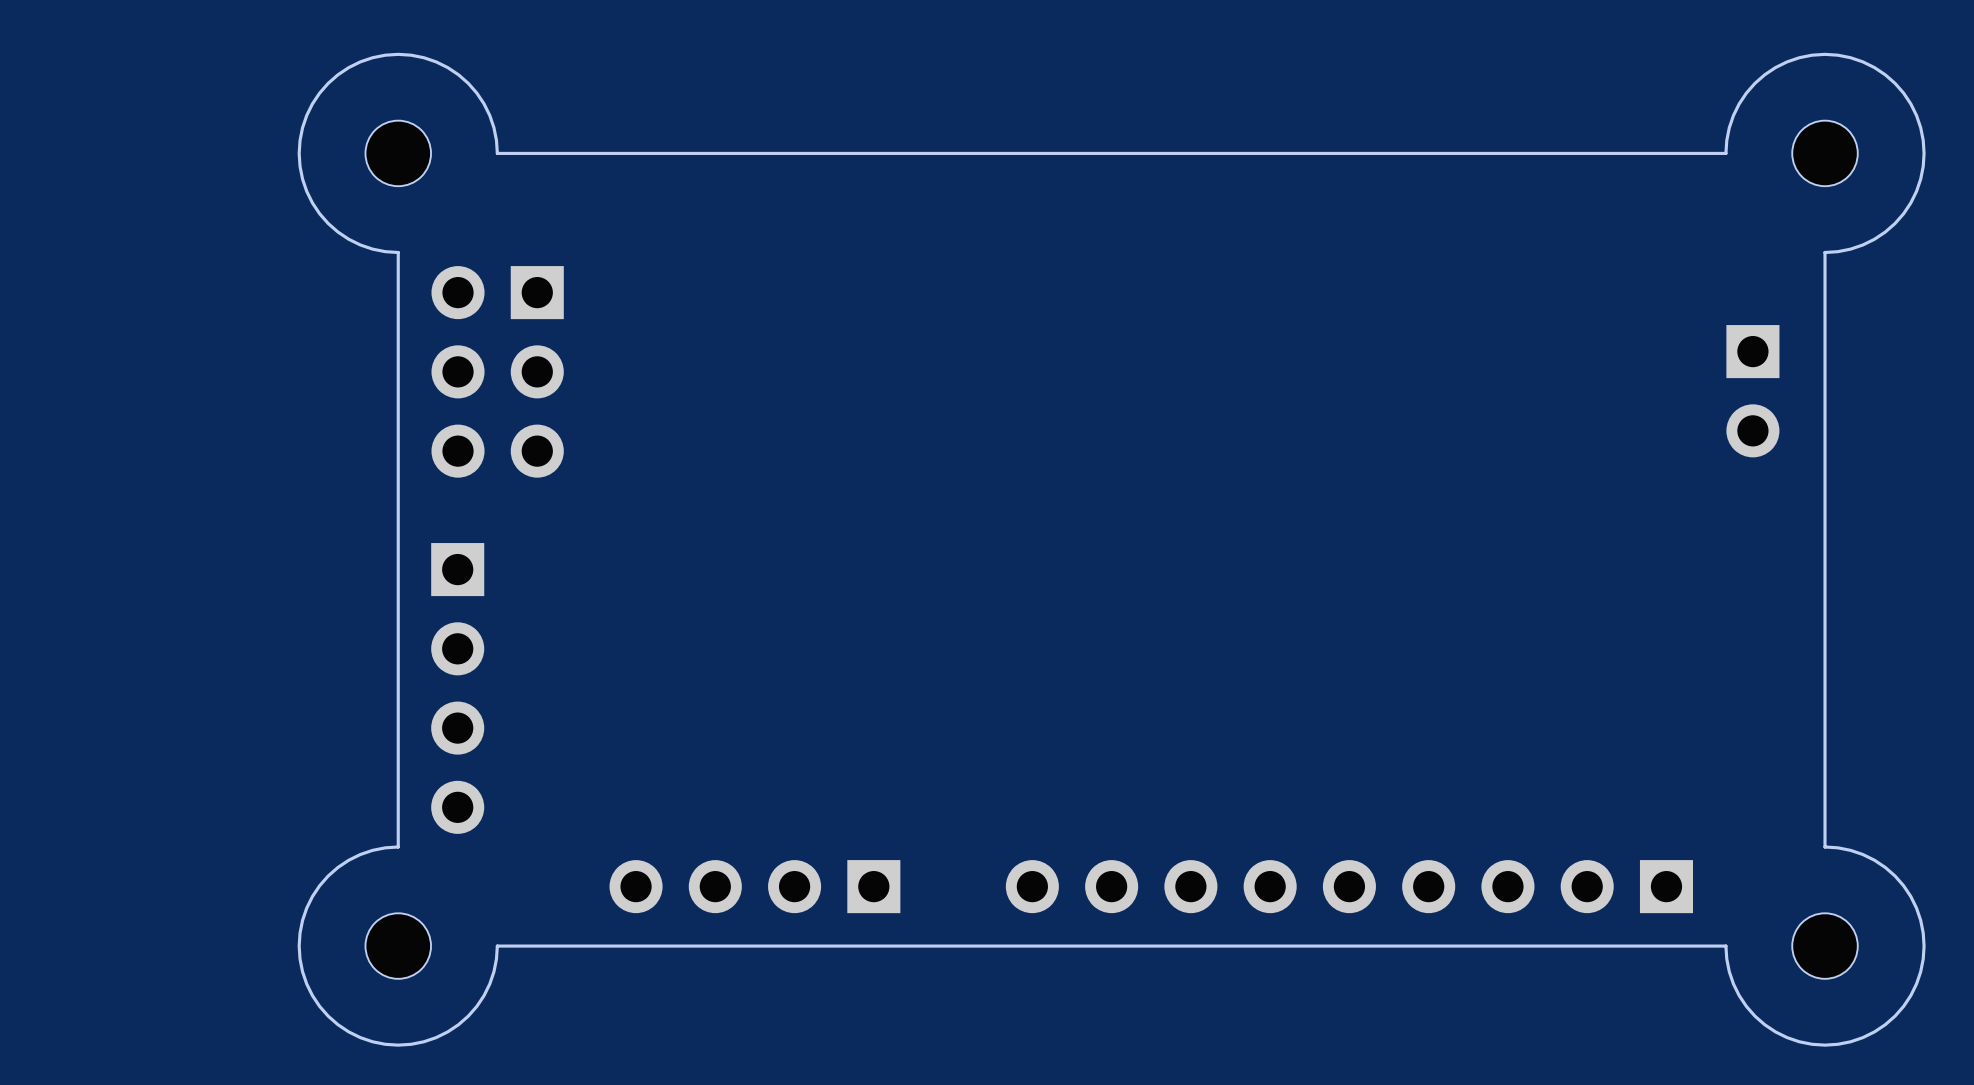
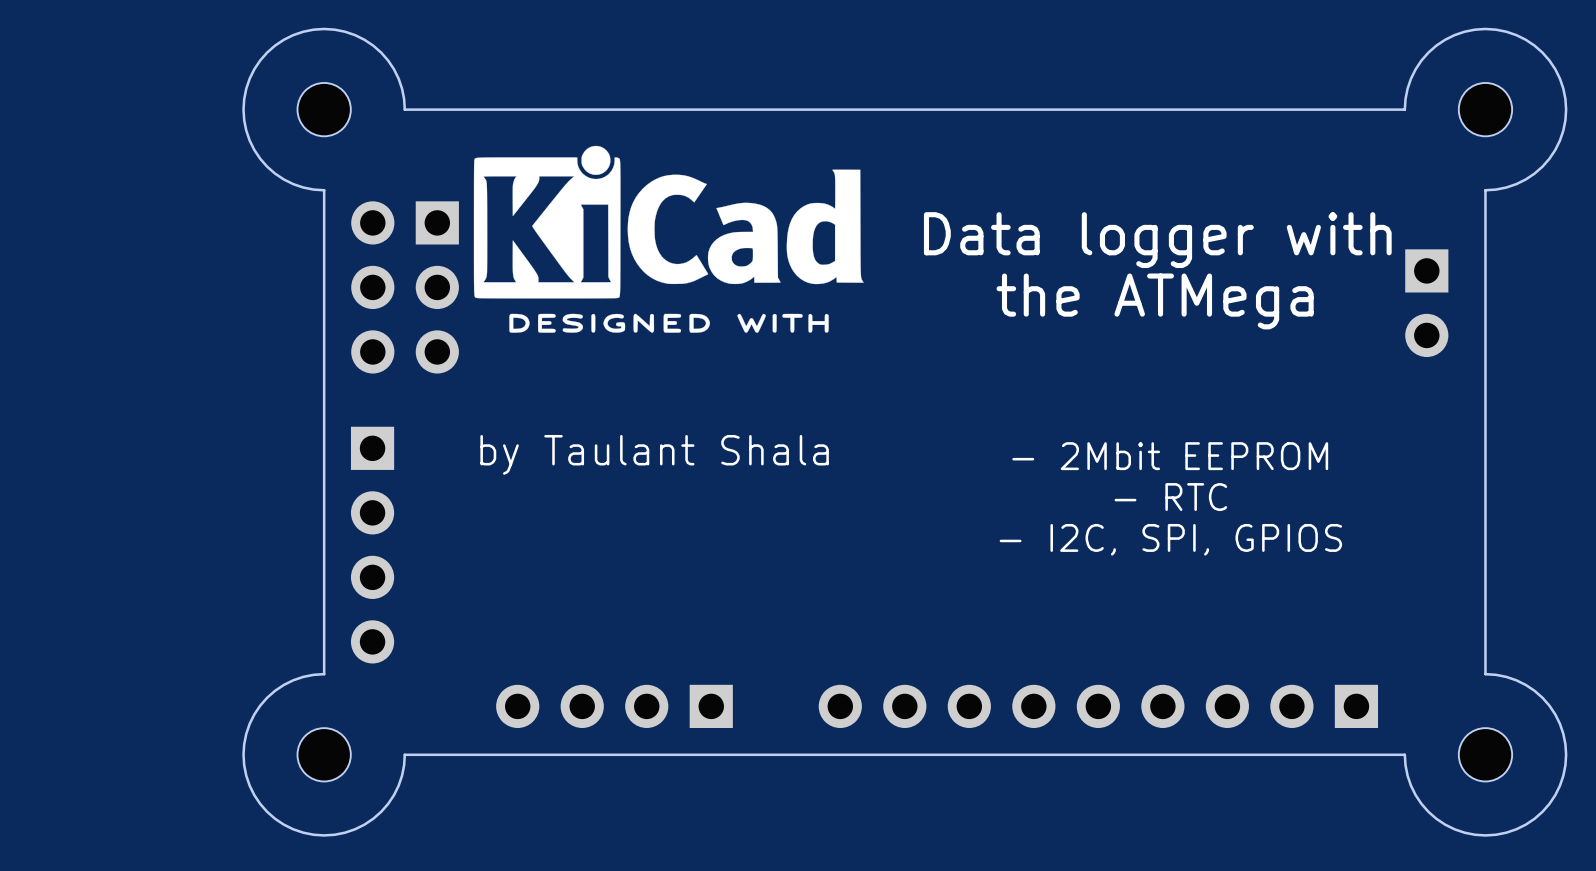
drawing: none -> [473, 145, 864, 333]
text: none -> Data logger with (1157, 240)
text: none -> the ATMega (1155, 301)
text: none -> by Taulant Shala (654, 454)
text: none -> - 2Mbit EEPROM (1170, 456)
text: none -> - RTC (1170, 497)
text: none -> - I2C, SPI, GPIOS (1170, 539)

